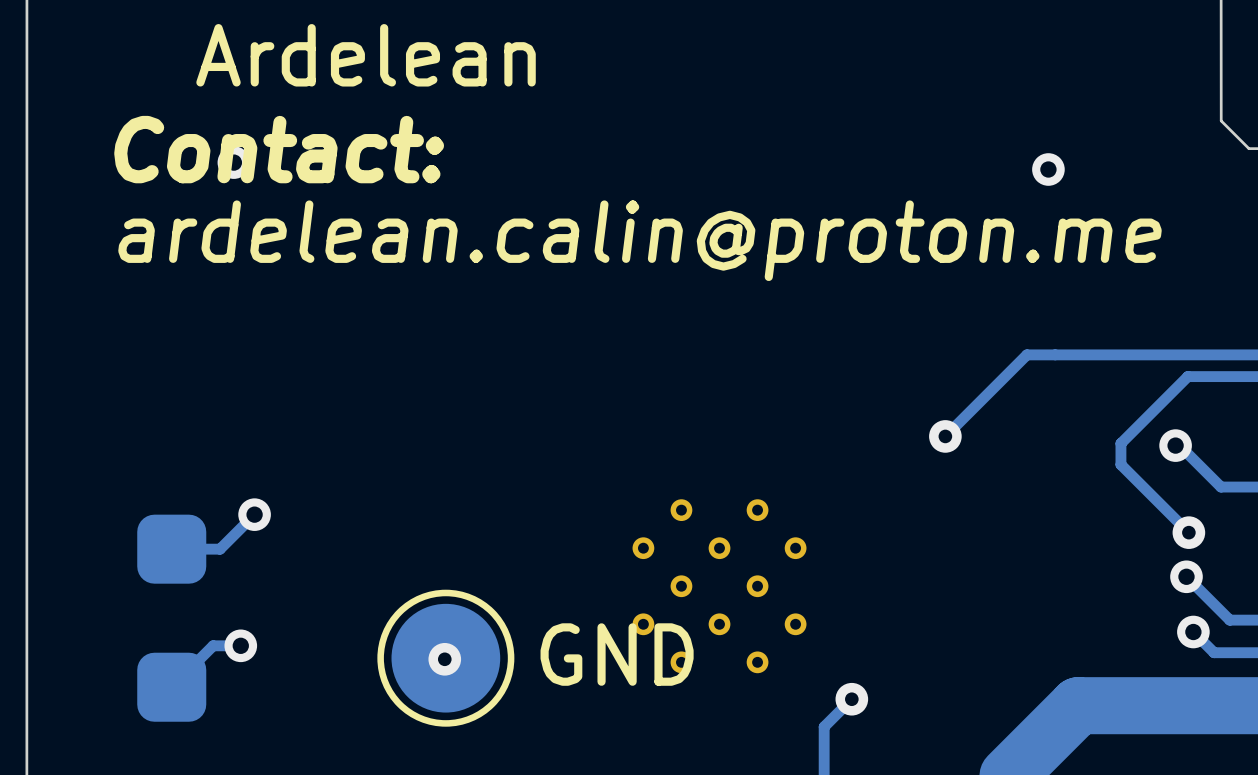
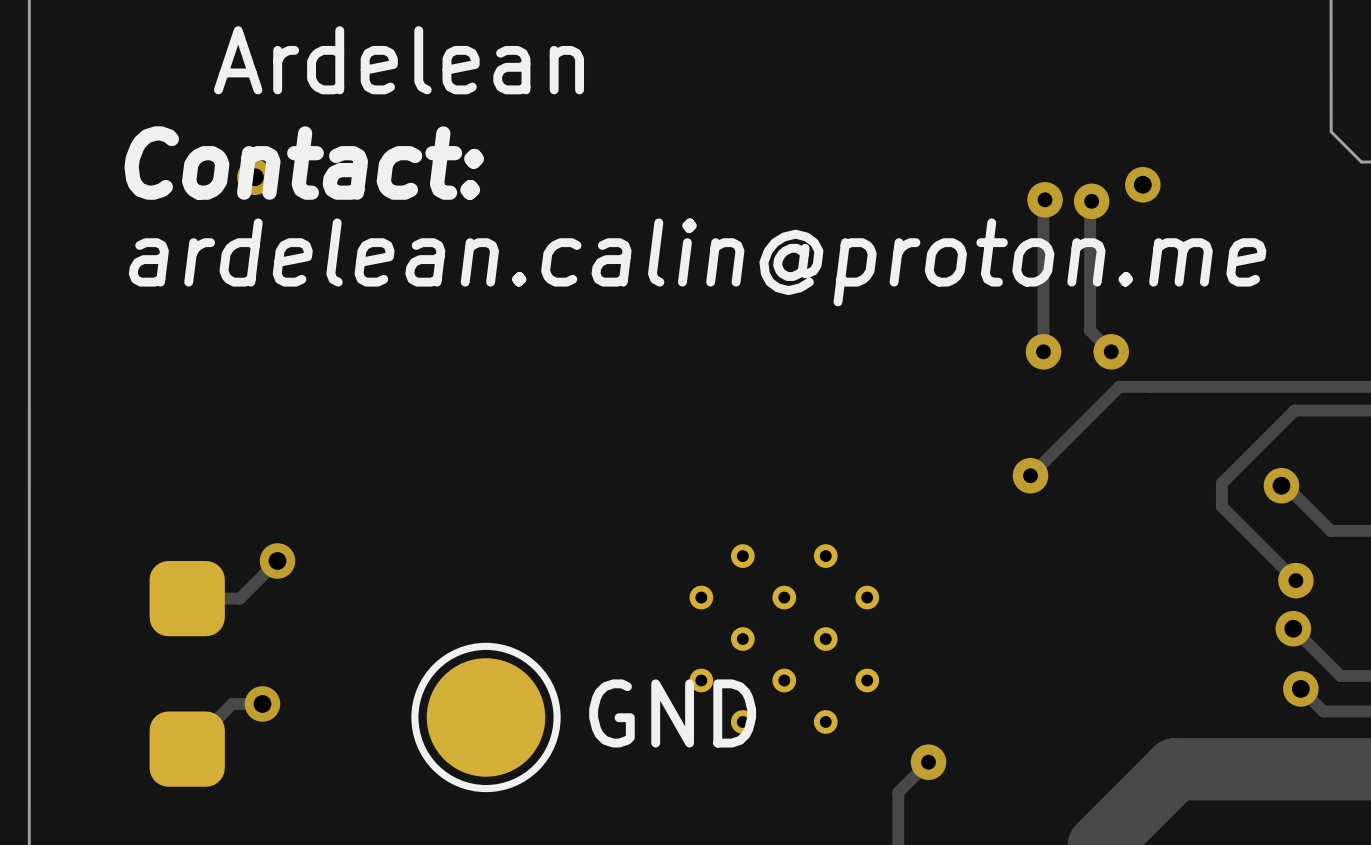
track: none -> (1045, 199) (1043, 351)
via: none -> (1045, 199)
track: none -> (1091, 201) (1090, 330) (1111, 351)
via: none -> (1091, 201)
via: none -> (1043, 351)
via: none -> (1111, 351)
via: (444, 659) -> none

